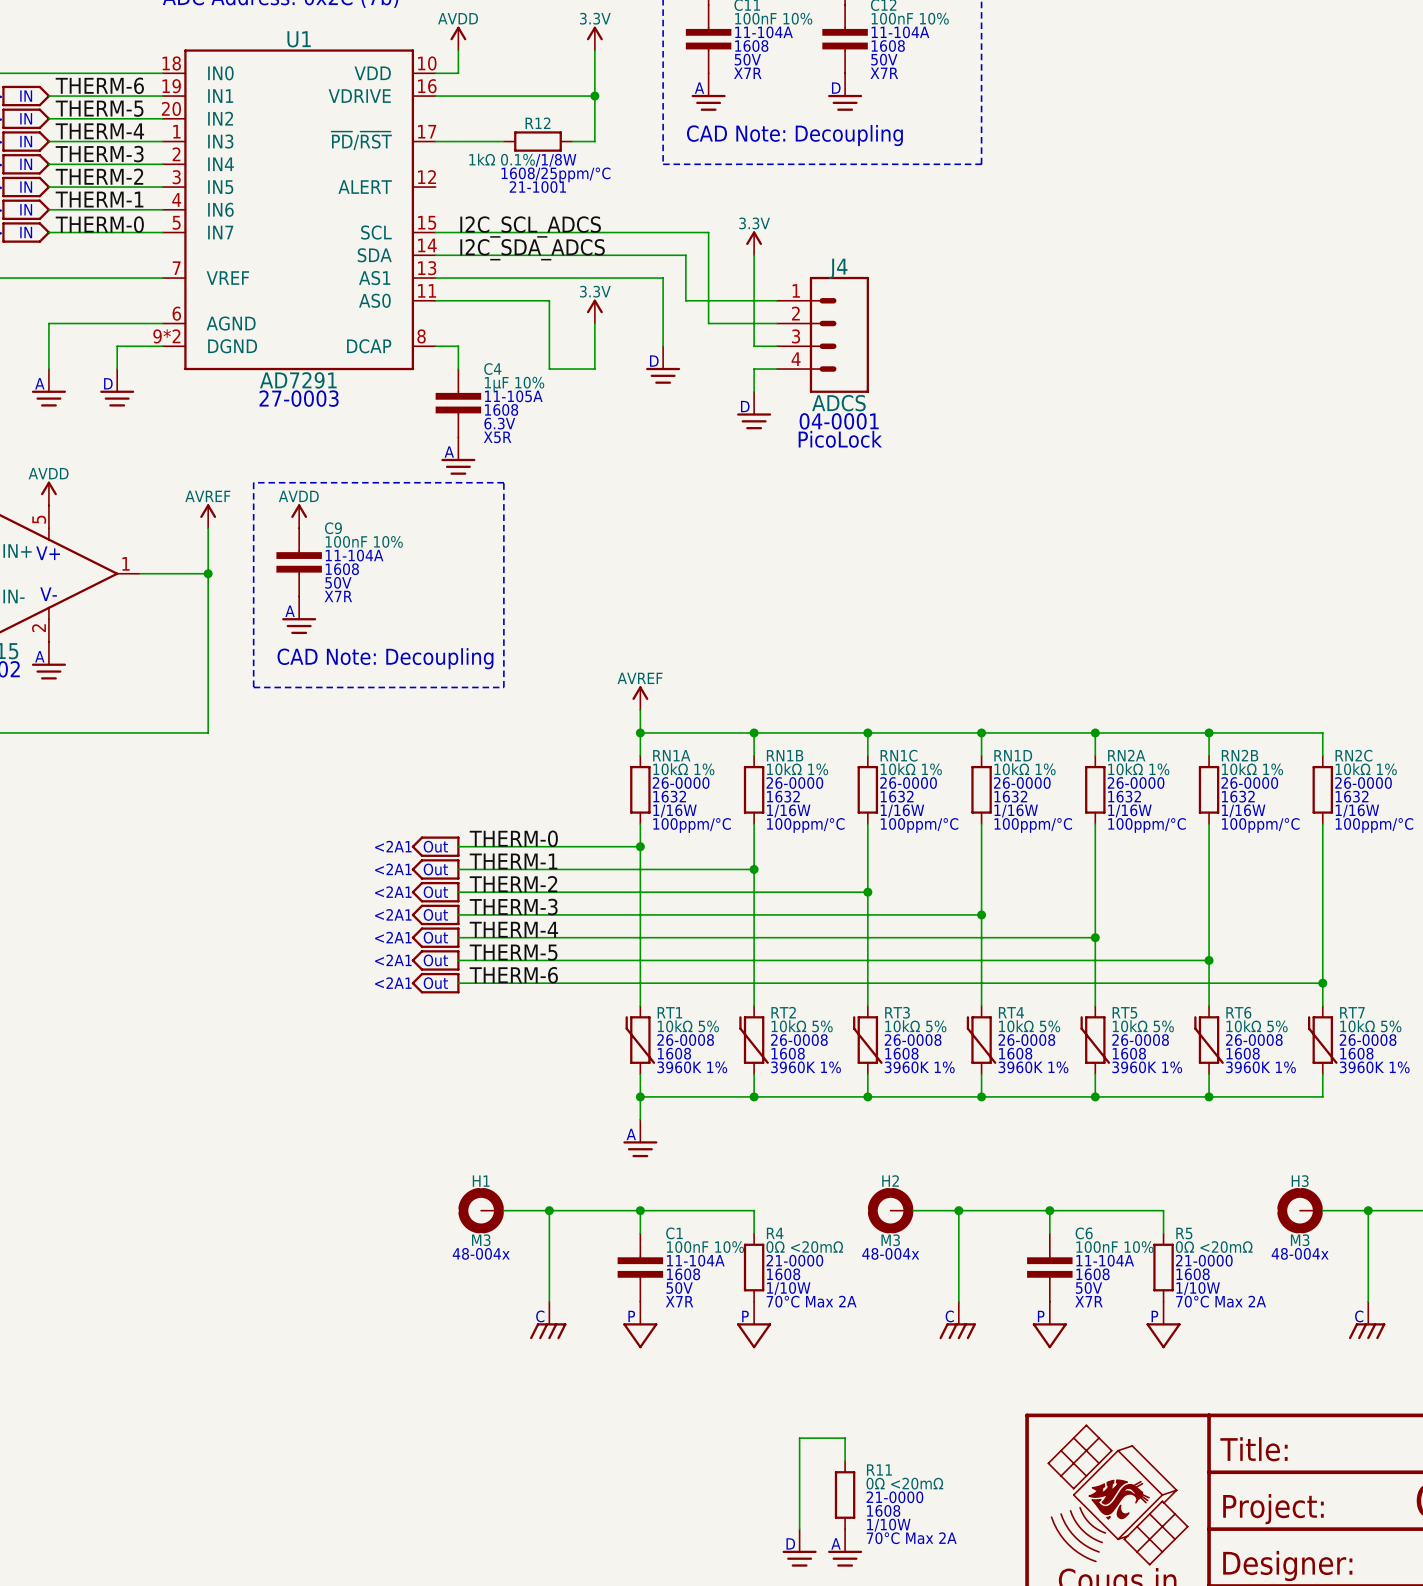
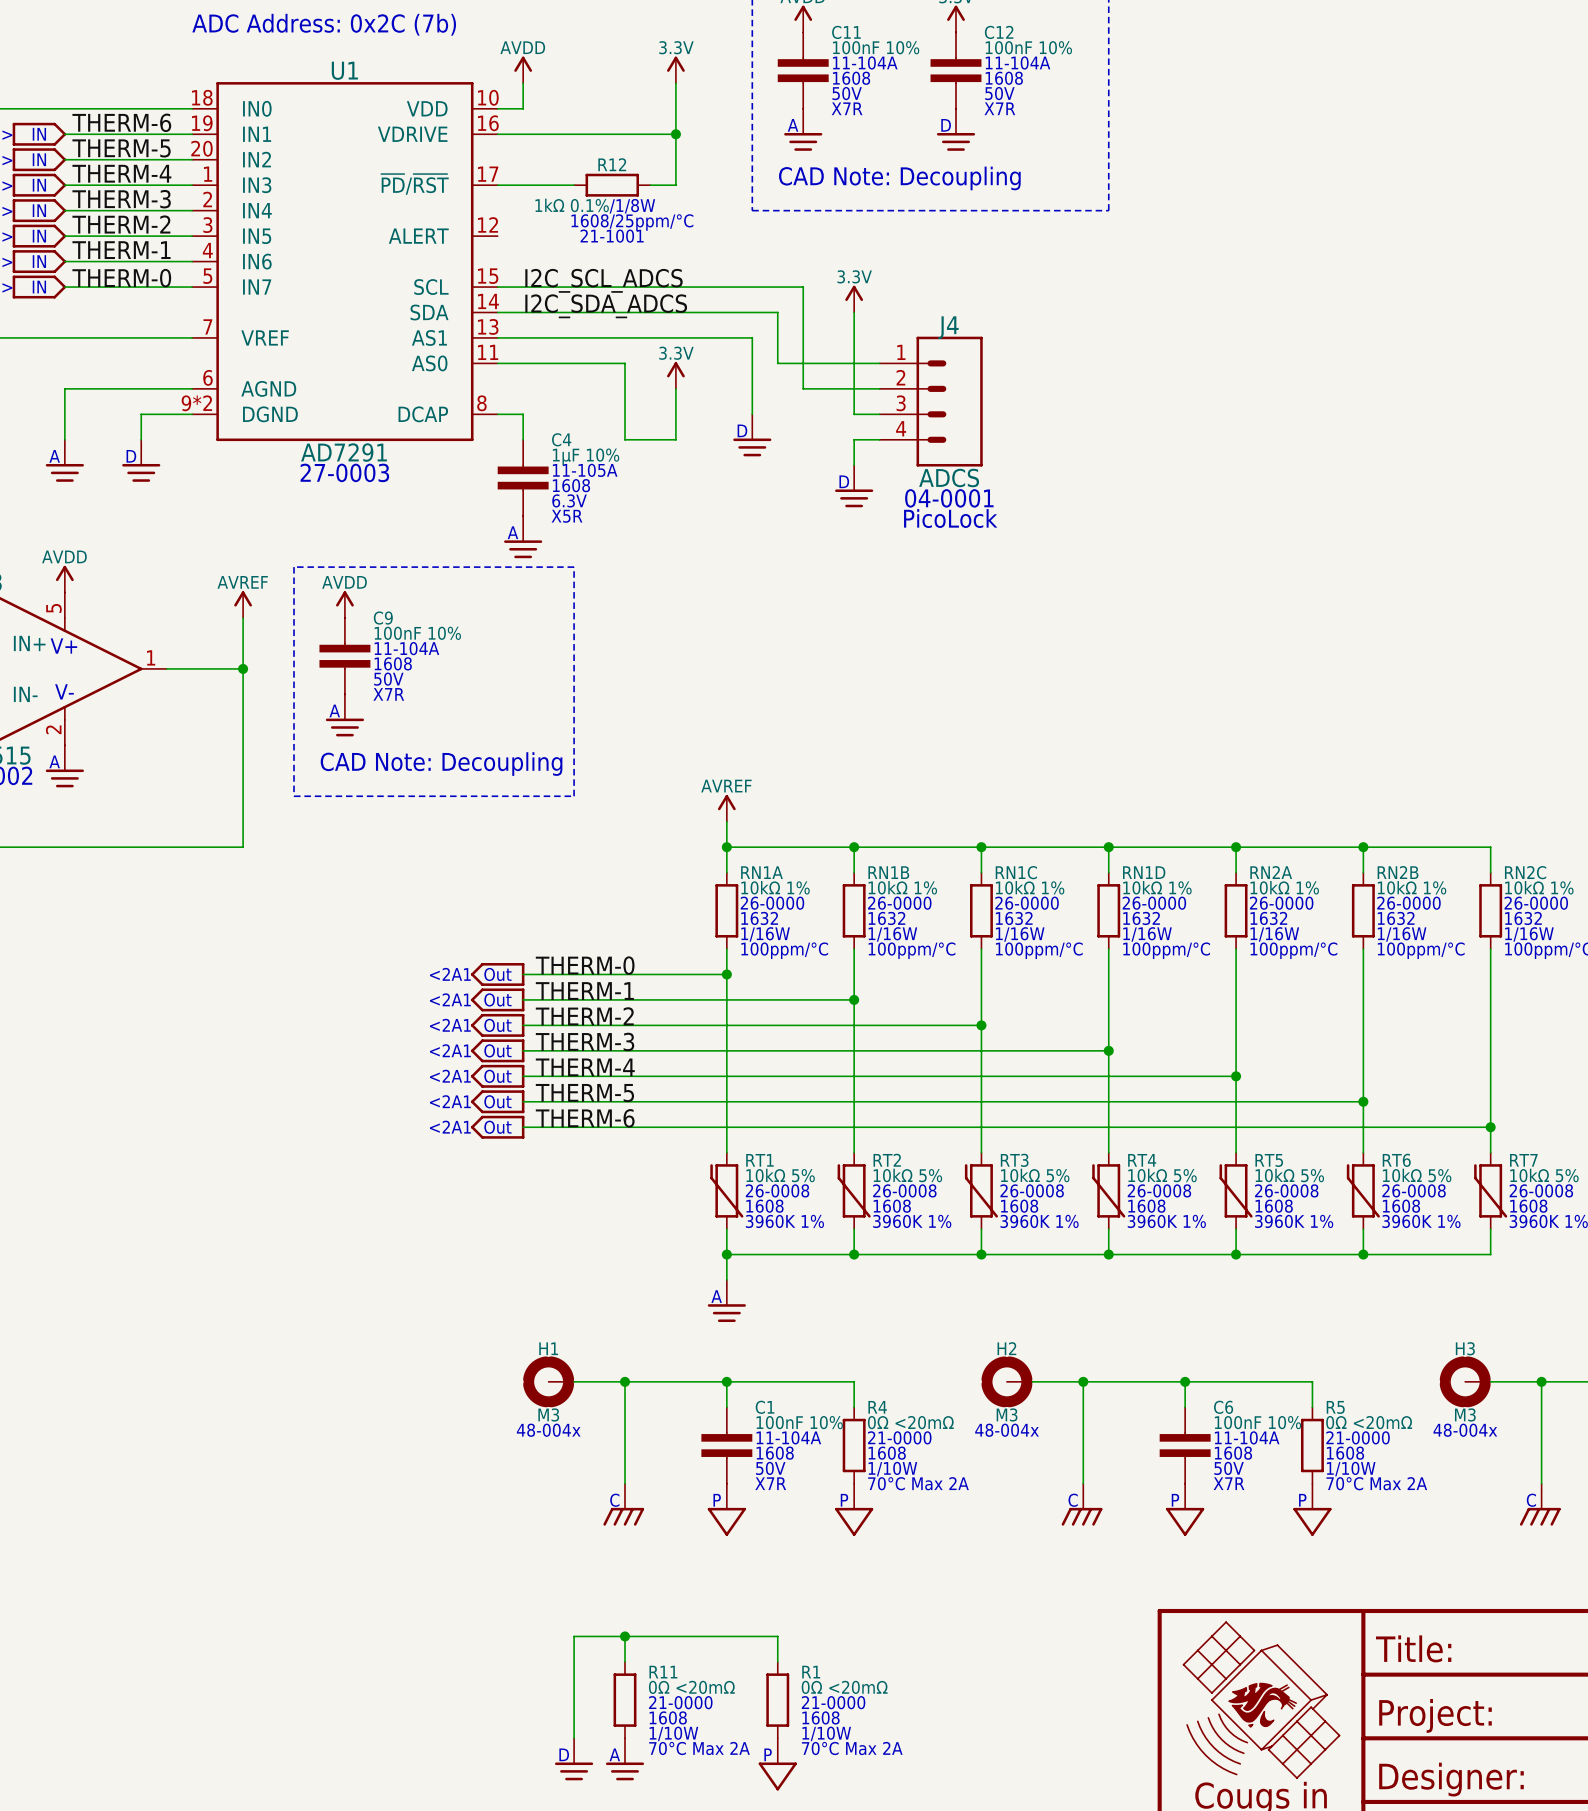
wire: none -> (625, 1636) (625, 1661)
junction: none -> (625, 1636)
wire: none -> (777, 1661) (777, 1636) (574, 1636) (574, 1738)
wire: (845, 1460) (845, 1438) (799, 1438) (799, 1529) -> none
R1: none -> 0Ω <20mΩ (777, 1700)
R11 position: (845, 1495) -> (625, 1700)
power symbol: none -> (574, 1759)
power symbol: none -> (625, 1759)
power symbol: (799, 1547) -> none
power symbol: (845, 1547) -> none
power symbol: none -> (777, 1764)

